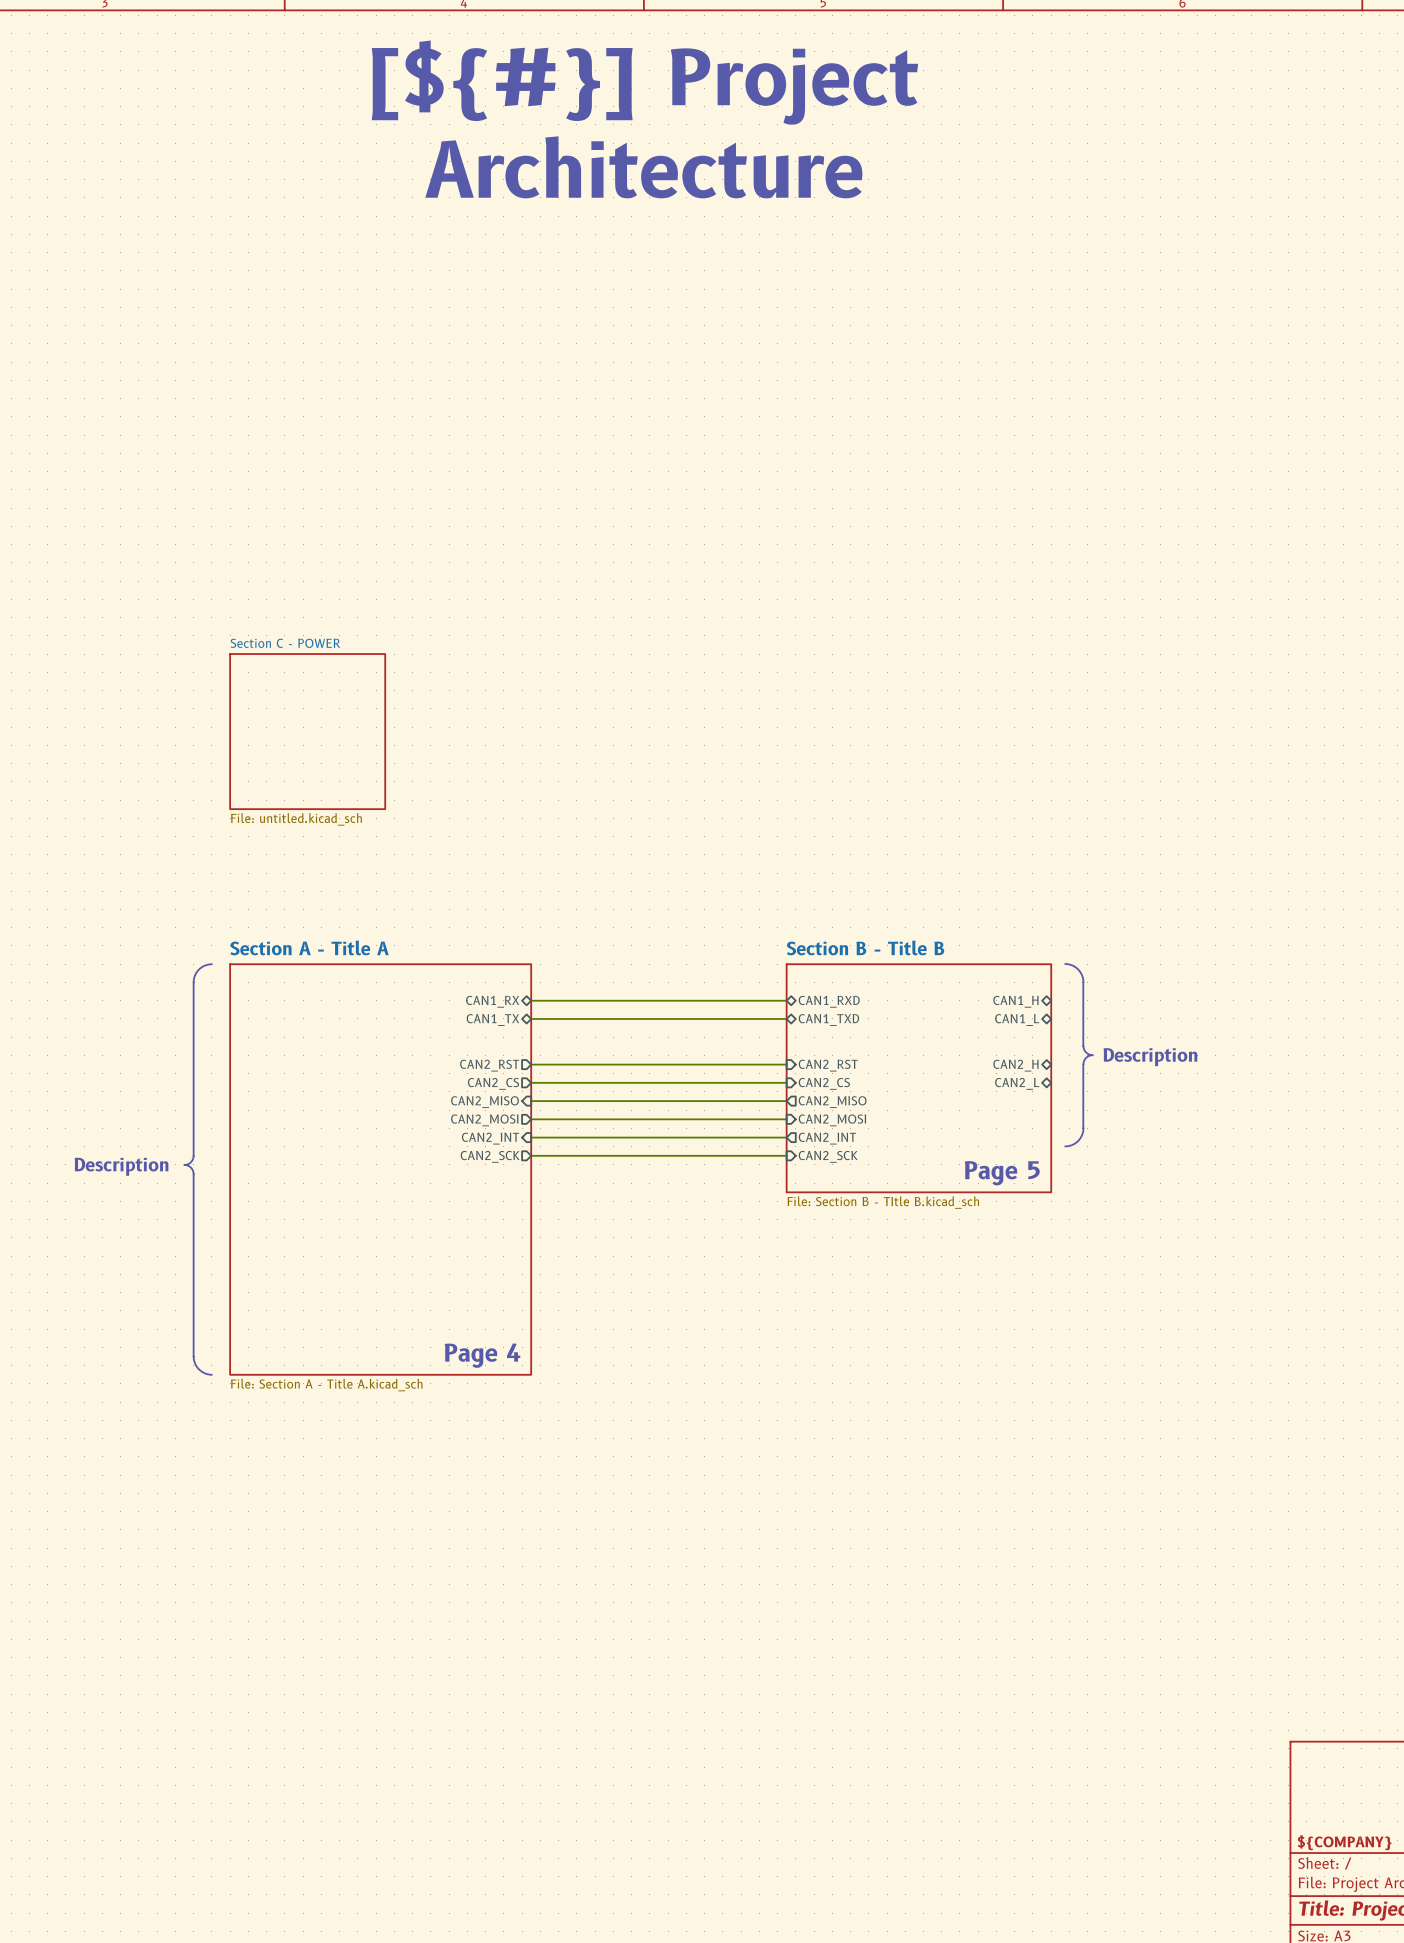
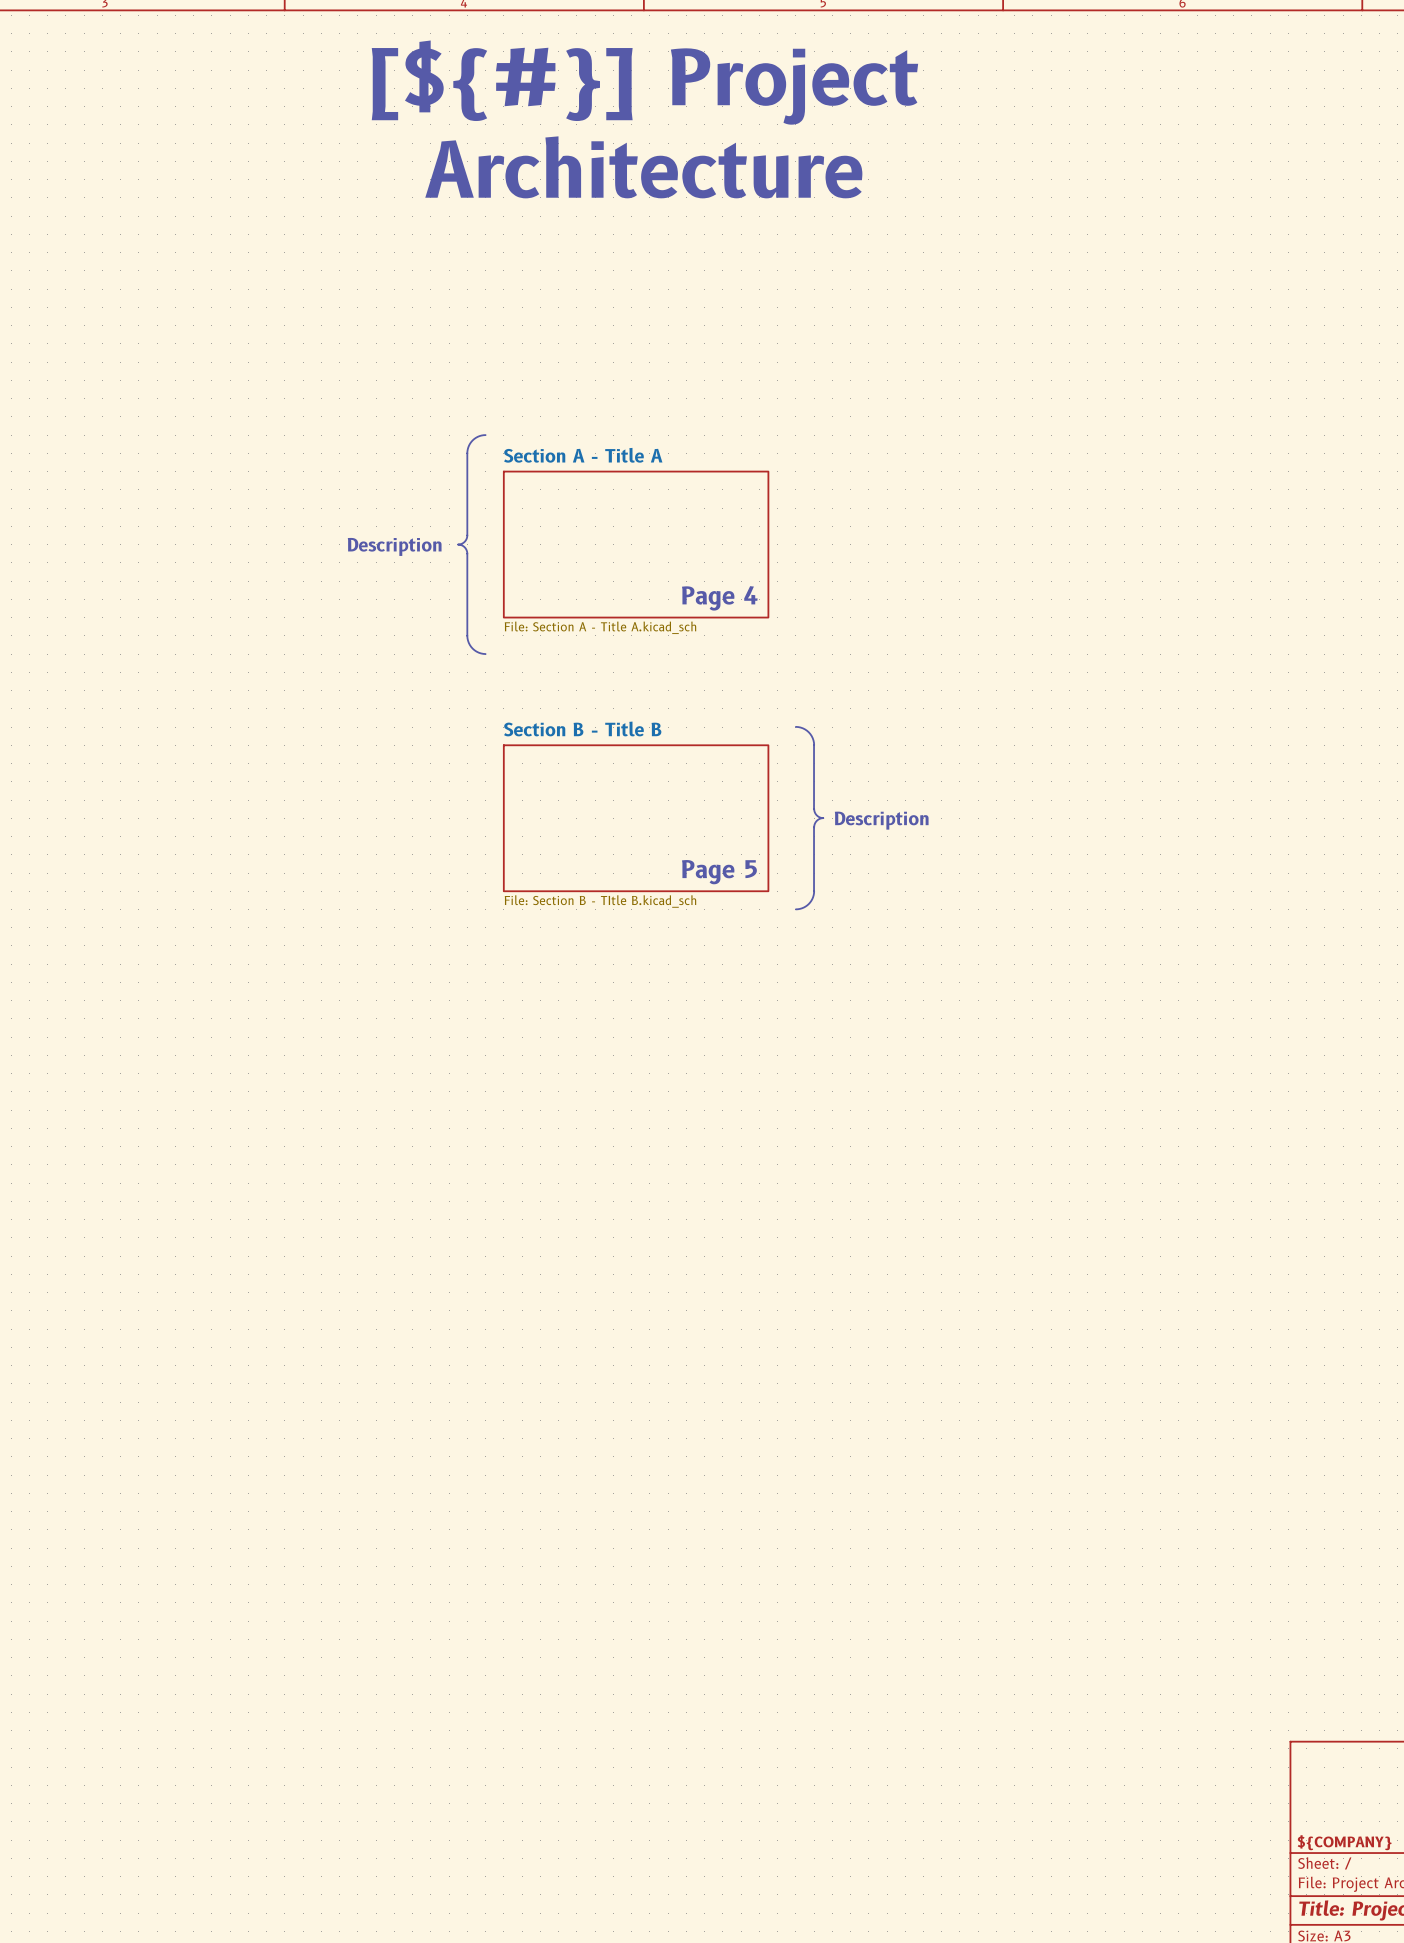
line: none -> (485, 435) (474, 439) (467, 449) (467, 536) (463, 542) (458, 544) (463, 546) (467, 552) (467, 640) (474, 650) (485, 654)
sheet Section A - Title A: none -> File: Section A - Title A.kicad_sch (636, 544)
text: none -> Description (394, 546)
text: none -> Page 4 (719, 598)
line: none -> (795, 726) (808, 732) (814, 745)
sheet Section C - POWER: File: untitled.kicad_sch (307, 731) -> none
line: none -> (814, 745) (814, 809)
line: none -> (814, 808) (816, 815) (823, 818) (816, 820) (814, 827)
sheet Section B - Title B: none -> File: Section B - TItle B.kicad_sch (636, 818)
text: none -> Description (881, 820)
line: none -> (814, 827) (814, 891)
text: none -> Page 5 (719, 872)
line: none -> (814, 891) (808, 904) (795, 909)
line: (1065, 963) (1078, 969) (1083, 982) -> none
line: (211, 964) (198, 969) (193, 980) (193, 1155) (190, 1162) (184, 1164) (190, 1167) (193, 1174) (193, 1358) (199, 1369) (211, 1374) -> none
line: (1083, 982) (1083, 1046) -> none
wire: (531, 1000) (786, 1000) -> none
sheet pin: CAN1_RX (492, 1001) -> none
sheet pin: CAN1_RXD (829, 1001) -> none
sheet pin: CAN1_H (1015, 1001) -> none
wire: (531, 1018) (786, 1018) -> none
sheet pin: CAN1_TX (492, 1020) -> none
sheet pin: CAN1_TXD (828, 1020) -> none
sheet pin: CAN1_L (1017, 1020) -> none
line: (1083, 1046) (1086, 1052) (1092, 1055) (1086, 1057) (1083, 1064) -> none
text: Description (1150, 1057) -> none
wire: (531, 1064) (786, 1064) -> none
line: (1083, 1064) (1083, 1128) -> none
sheet pin: CAN2_RST (489, 1065) -> none
sheet pin: CAN2_RST (828, 1065) -> none
sheet pin: CAN2_H (1015, 1065) -> none
sheet Section B - Title B: File: Section B - TItle B.kicad_sch (918, 1078) -> none
wire: (531, 1082) (786, 1082) -> none
sheet pin: CAN2_CS (493, 1083) -> none
sheet pin: CAN2_CS (824, 1083) -> none
sheet pin: CAN2_L (1017, 1083) -> none
wire: (531, 1101) (786, 1101) -> none
sheet pin: CAN2_MISO (484, 1102) -> none
sheet pin: CAN2_MISO (832, 1102) -> none
wire: (531, 1119) (786, 1119) -> none
sheet pin: CAN2_MOSI (484, 1120) -> none
sheet pin: CAN2_MOSI (832, 1120) -> none
line: (1083, 1128) (1078, 1141) (1065, 1146) -> none
wire: (531, 1137) (786, 1137) -> none
sheet pin: CAN2_INT (490, 1138) -> none
sheet pin: CAN2_INT (827, 1138) -> none
wire: (531, 1155) (786, 1155) -> none
sheet pin: CAN2_SCK (490, 1156) -> none
sheet pin: CAN2_SCK (828, 1156) -> none
text: Description (121, 1166) -> none
sheet Section A - Title A: File: Section A - Title A.kicad_sch (380, 1169) -> none
text: Page 5 (1002, 1173) -> none
text: Page 4 (482, 1355) -> none

